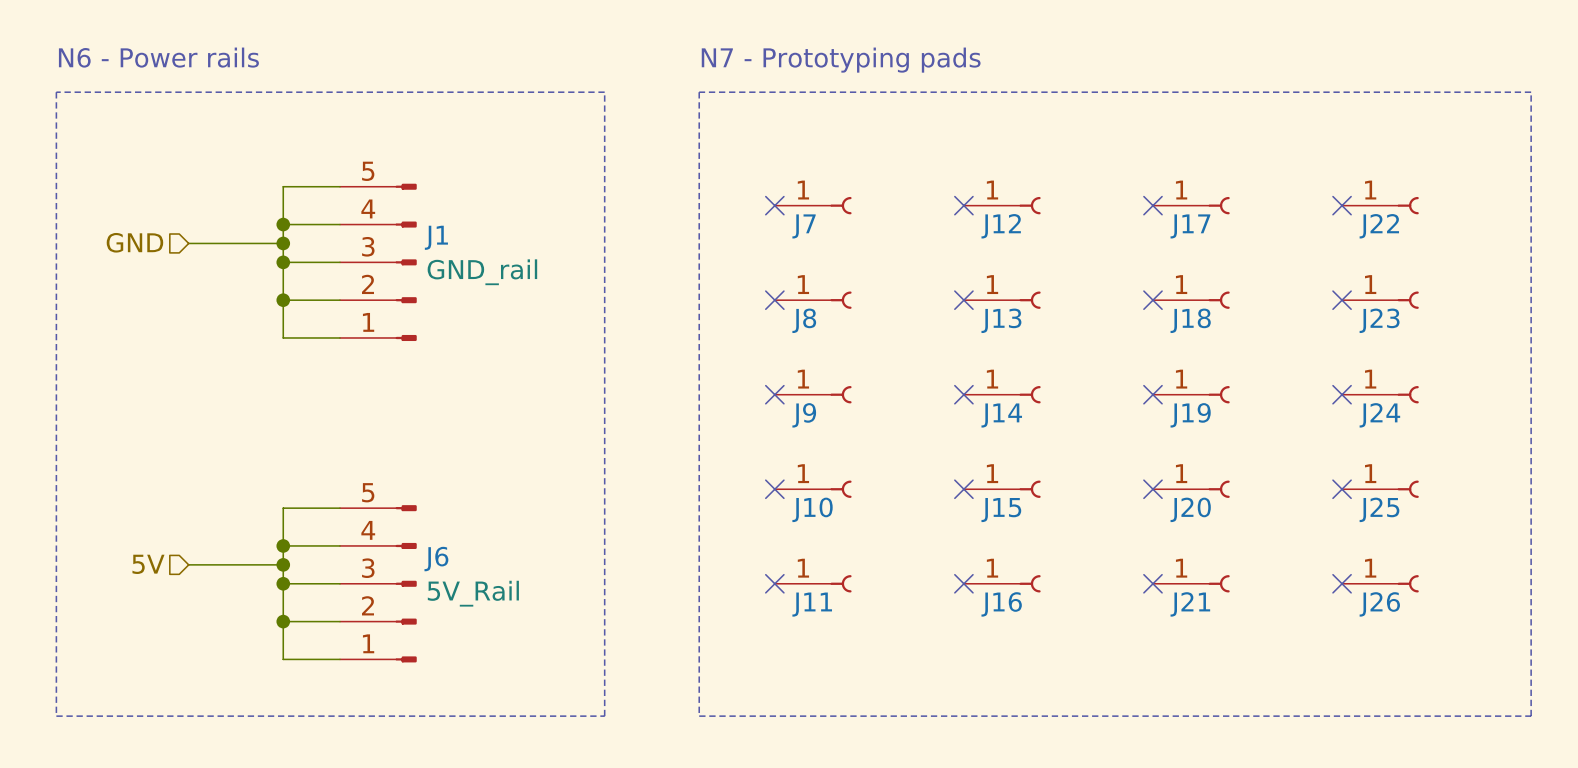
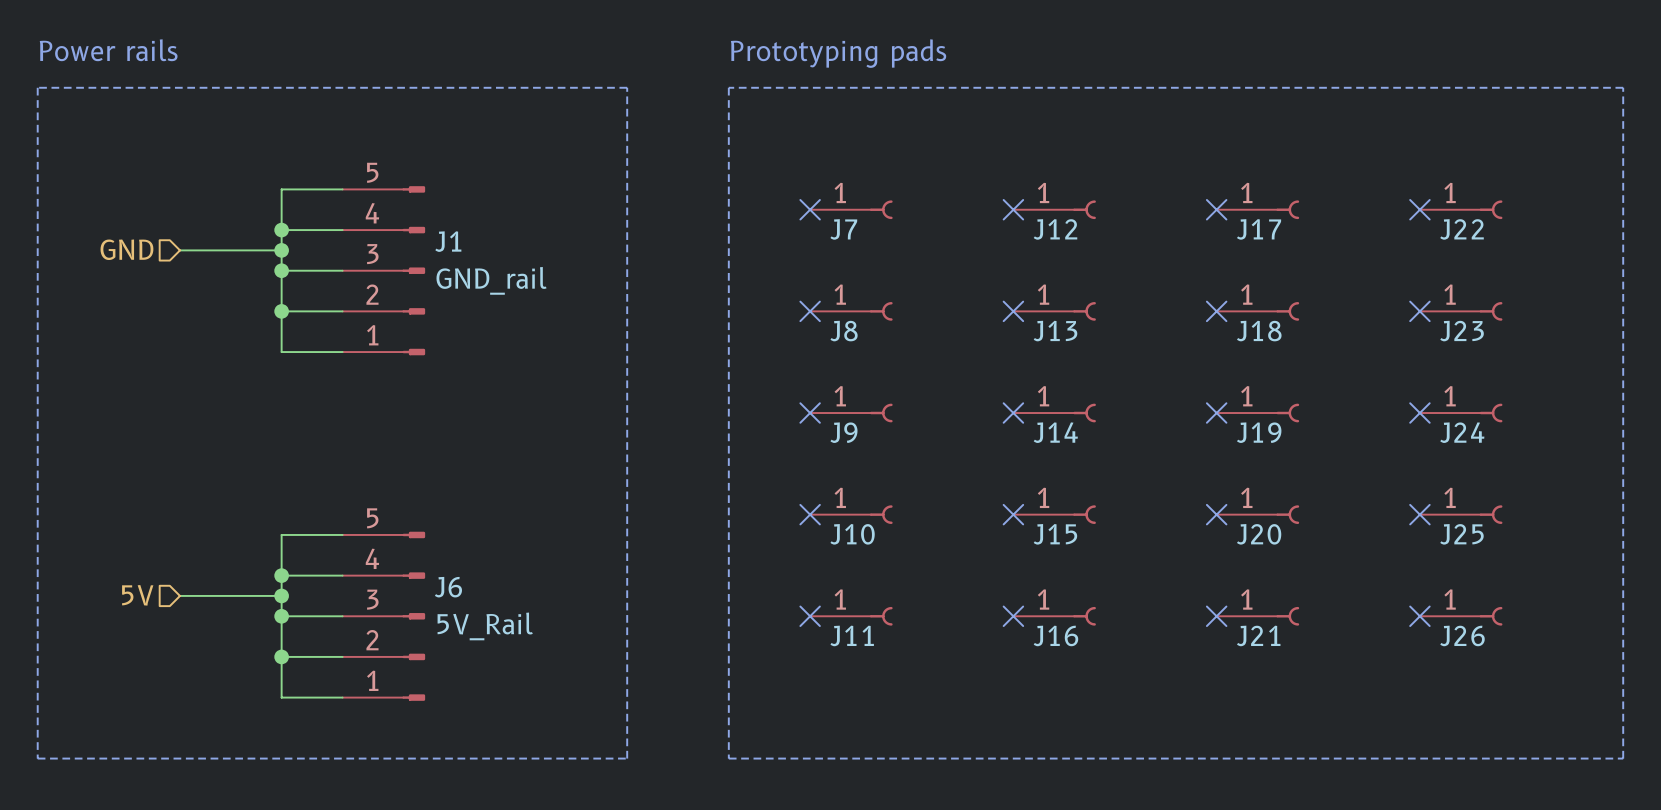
text: N6 - Power rails (158, 57) -> Power rails (108, 50)
text: N7 - Prototyping pads (841, 60) -> Prototyping pads (838, 53)

